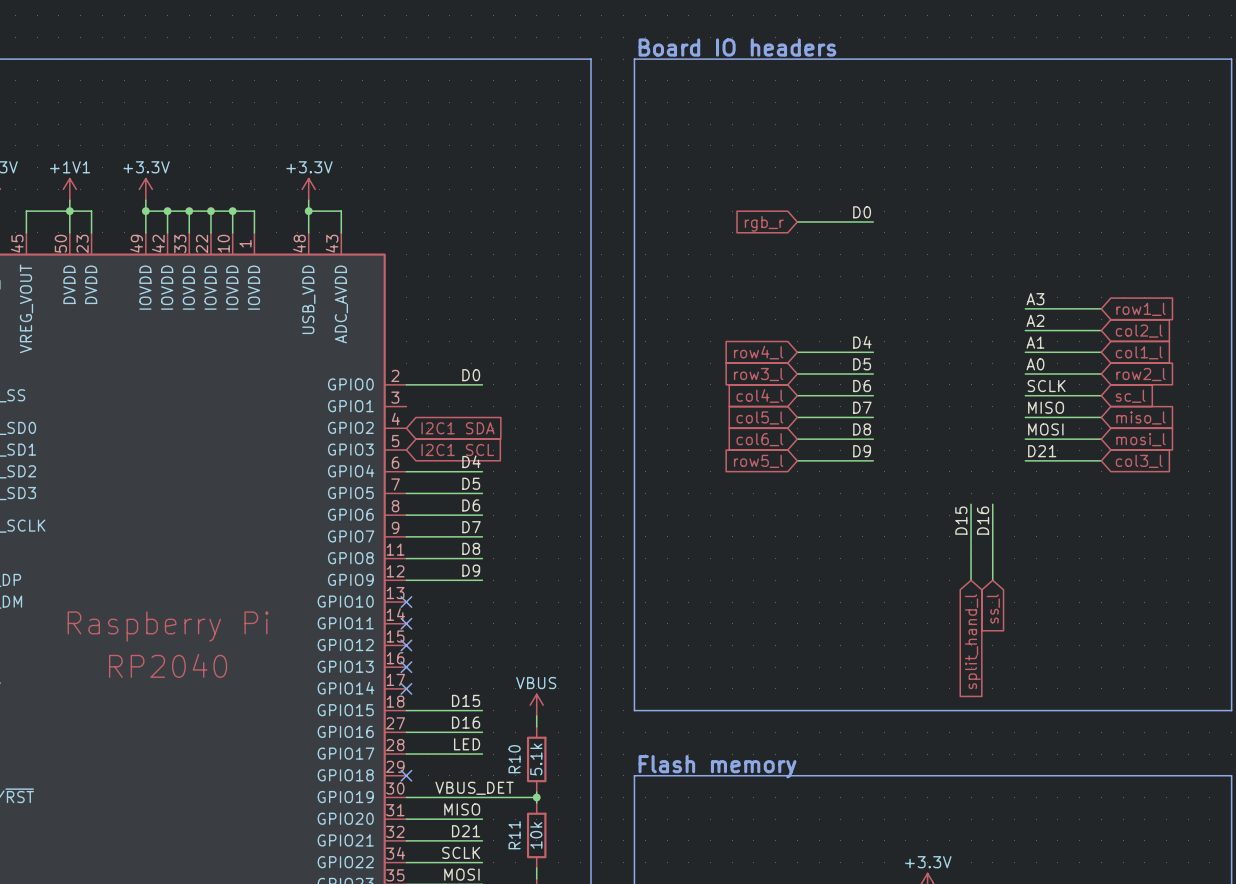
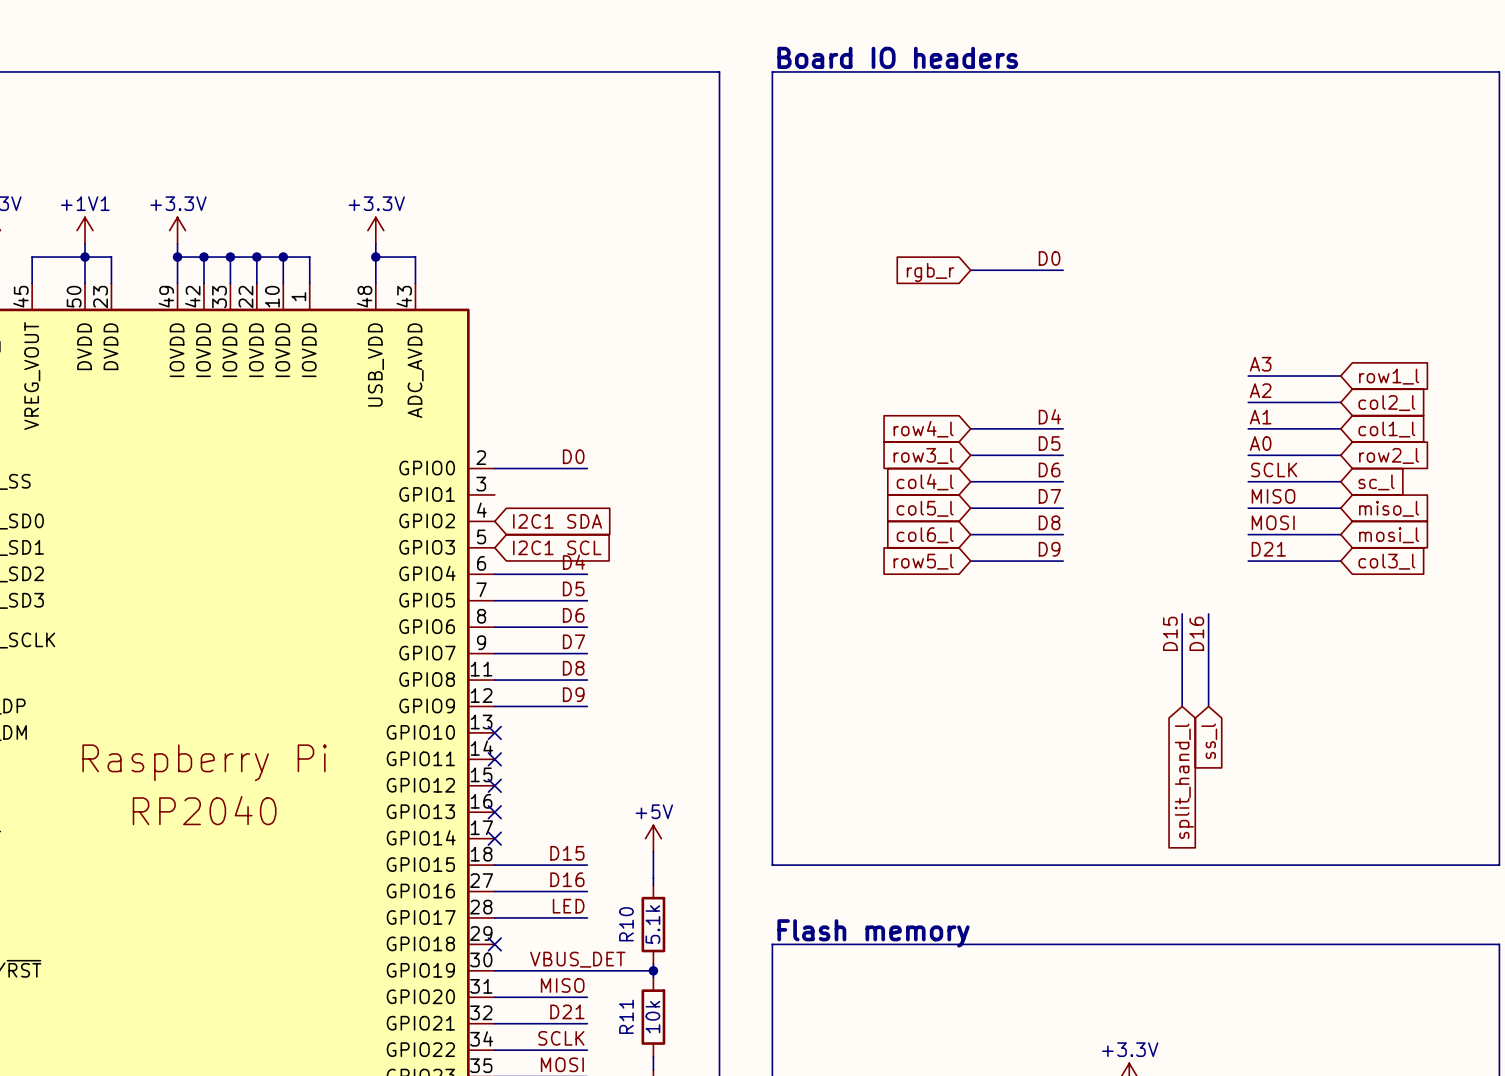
power symbol: none -> +5V (653, 838)
power symbol: VBUS (536, 705) -> none

